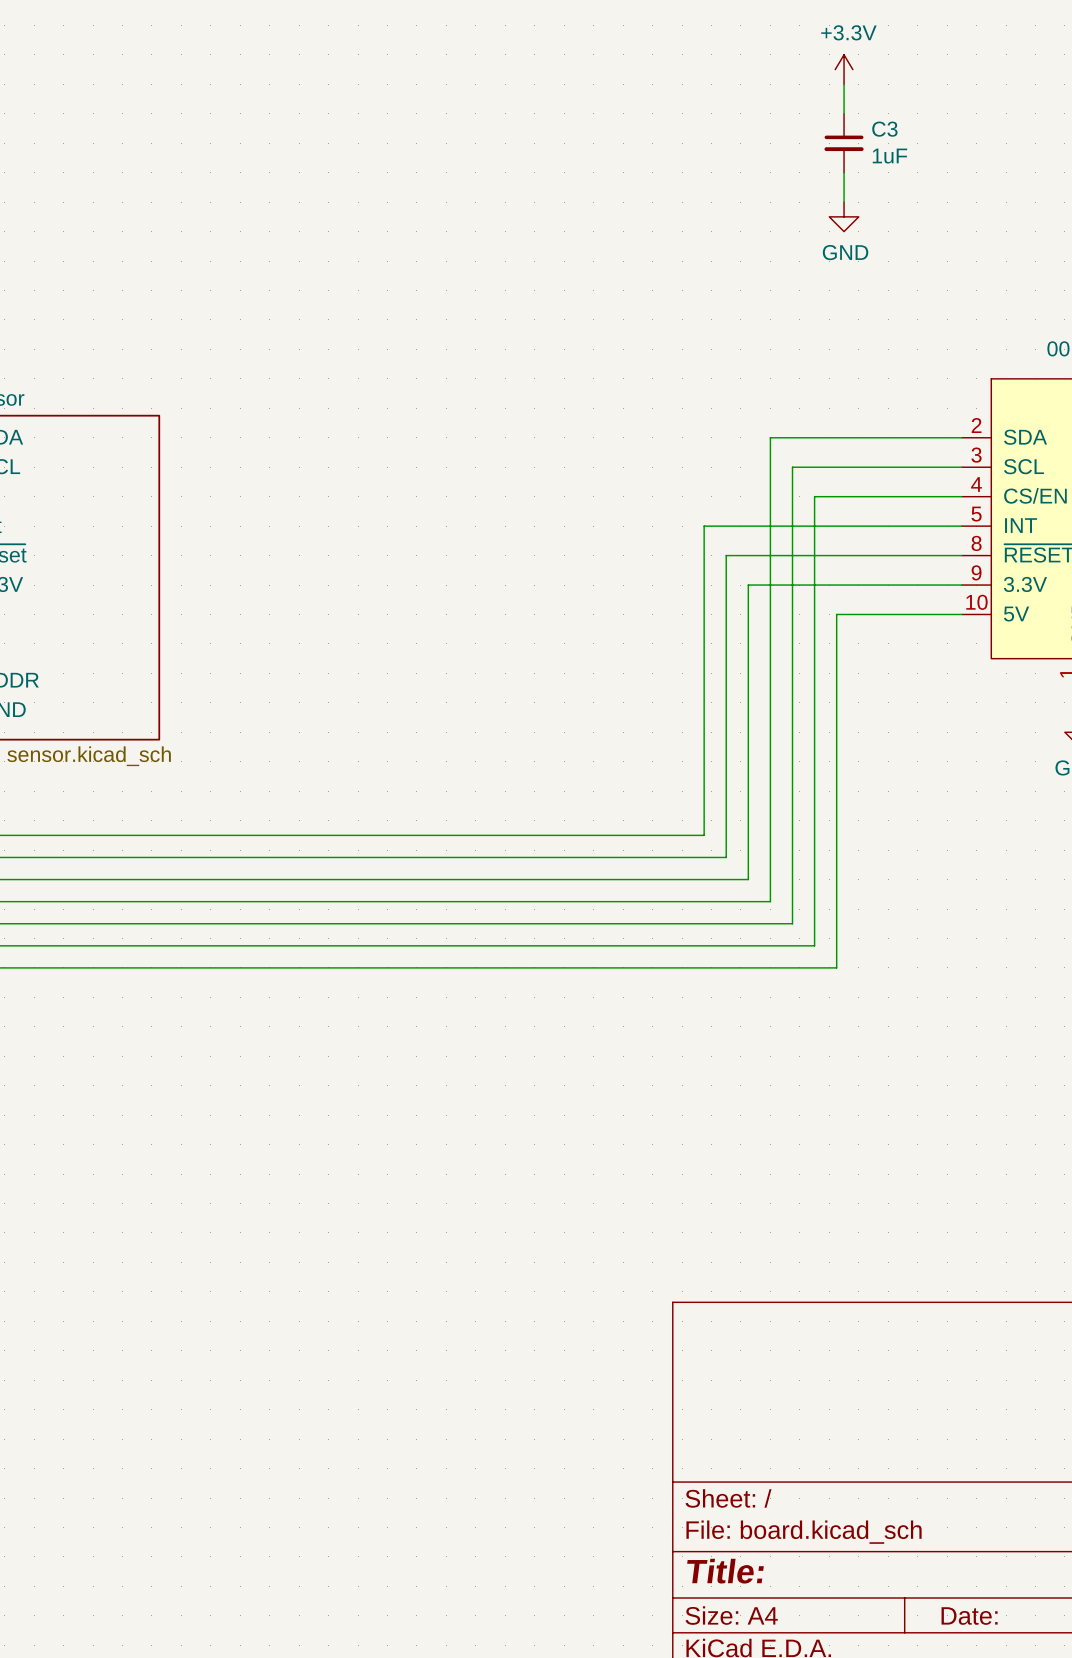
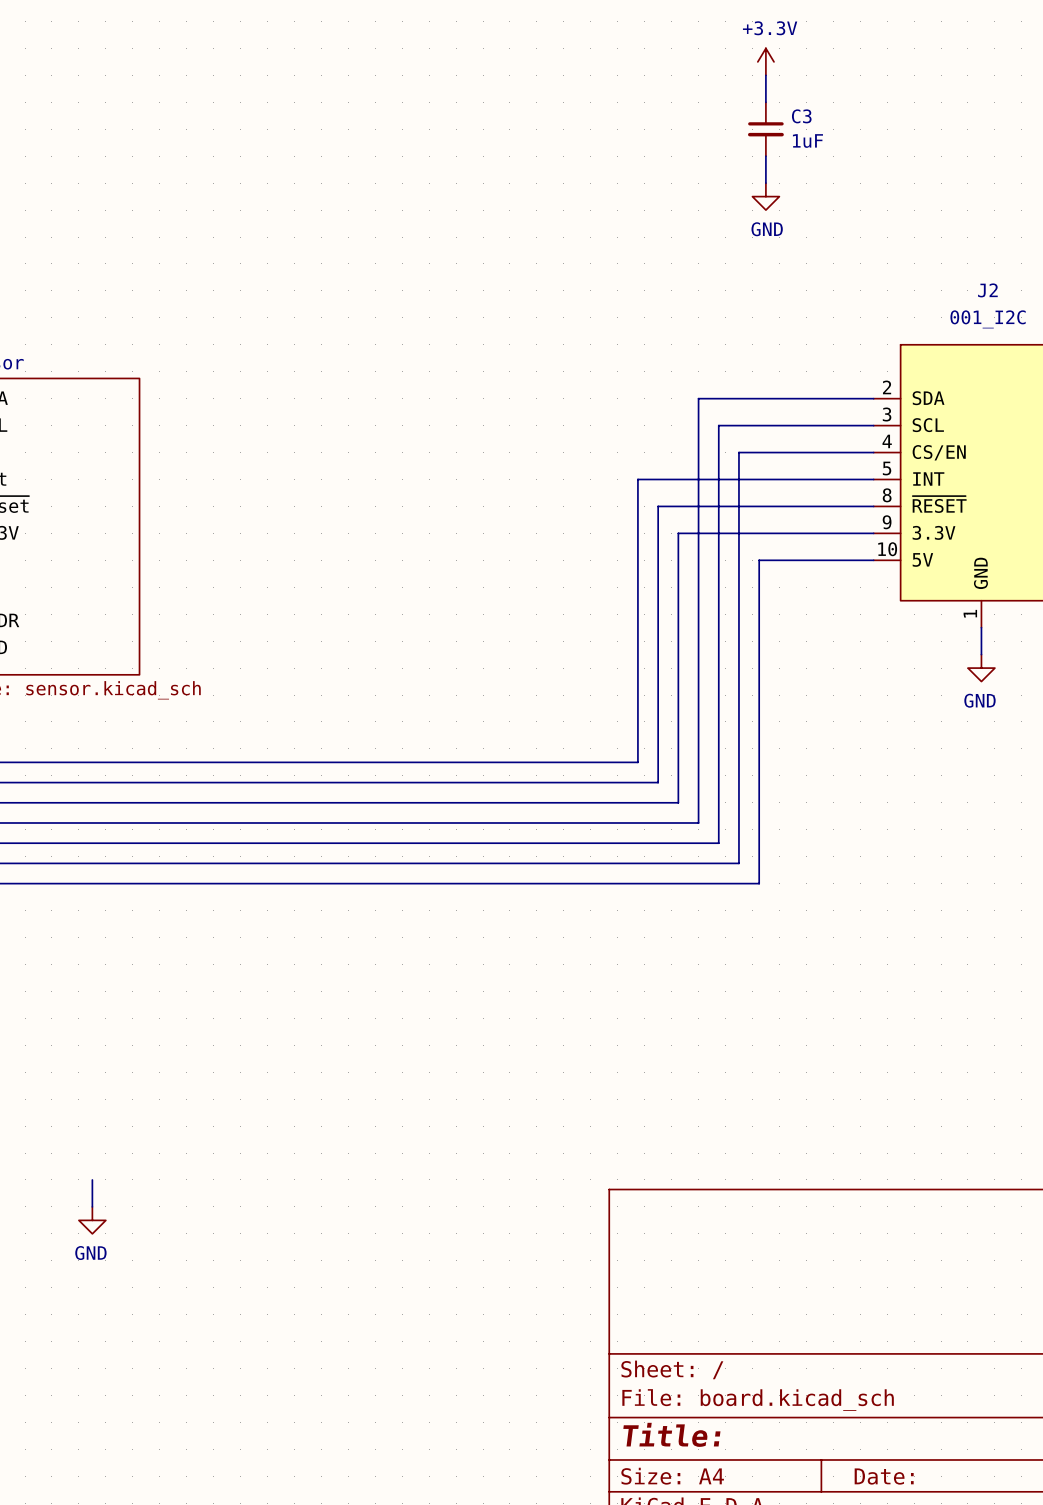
wire: none -> (92, 1179) (92, 1206)
power symbol: none -> GND (92, 1220)

